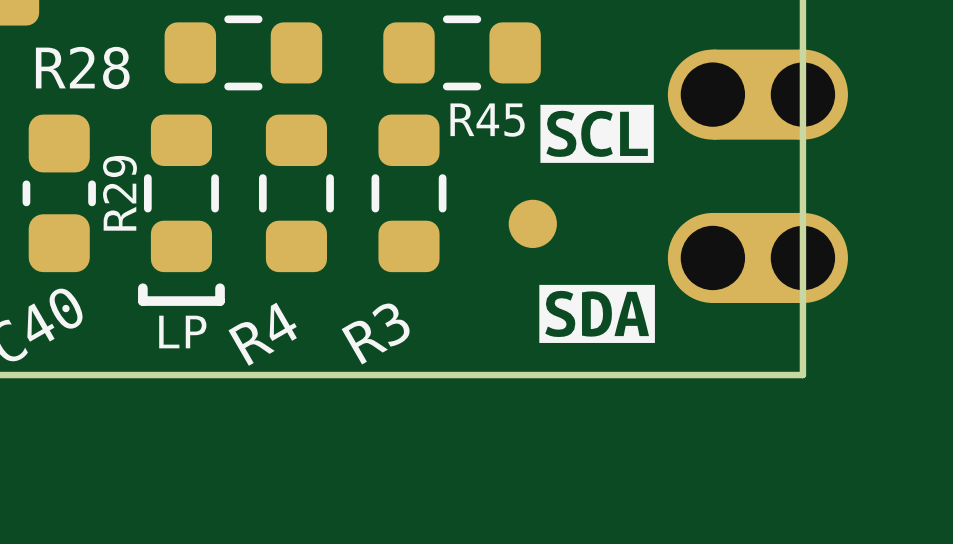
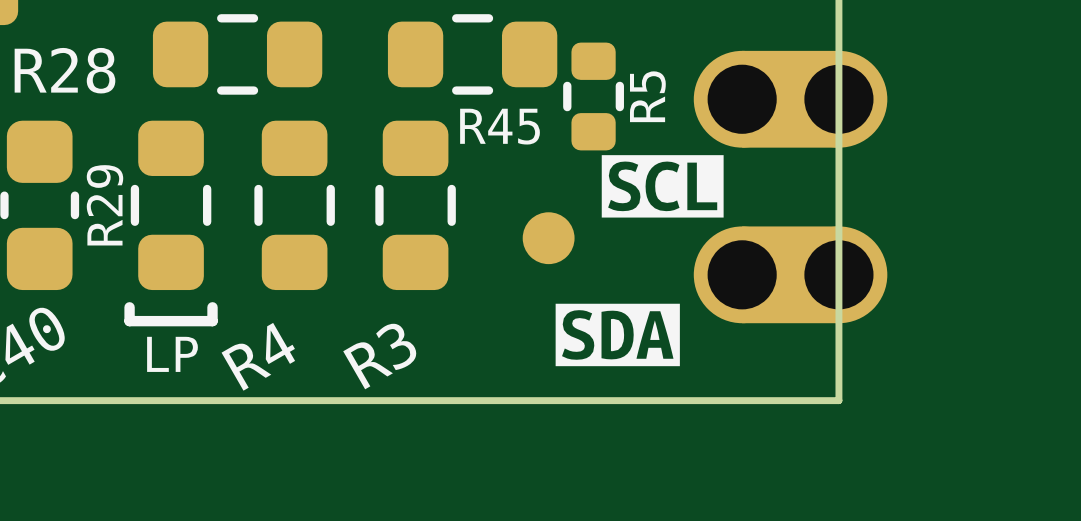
R5: none -> (593, 96)
drawing position: (597, 133) -> (662, 186)

